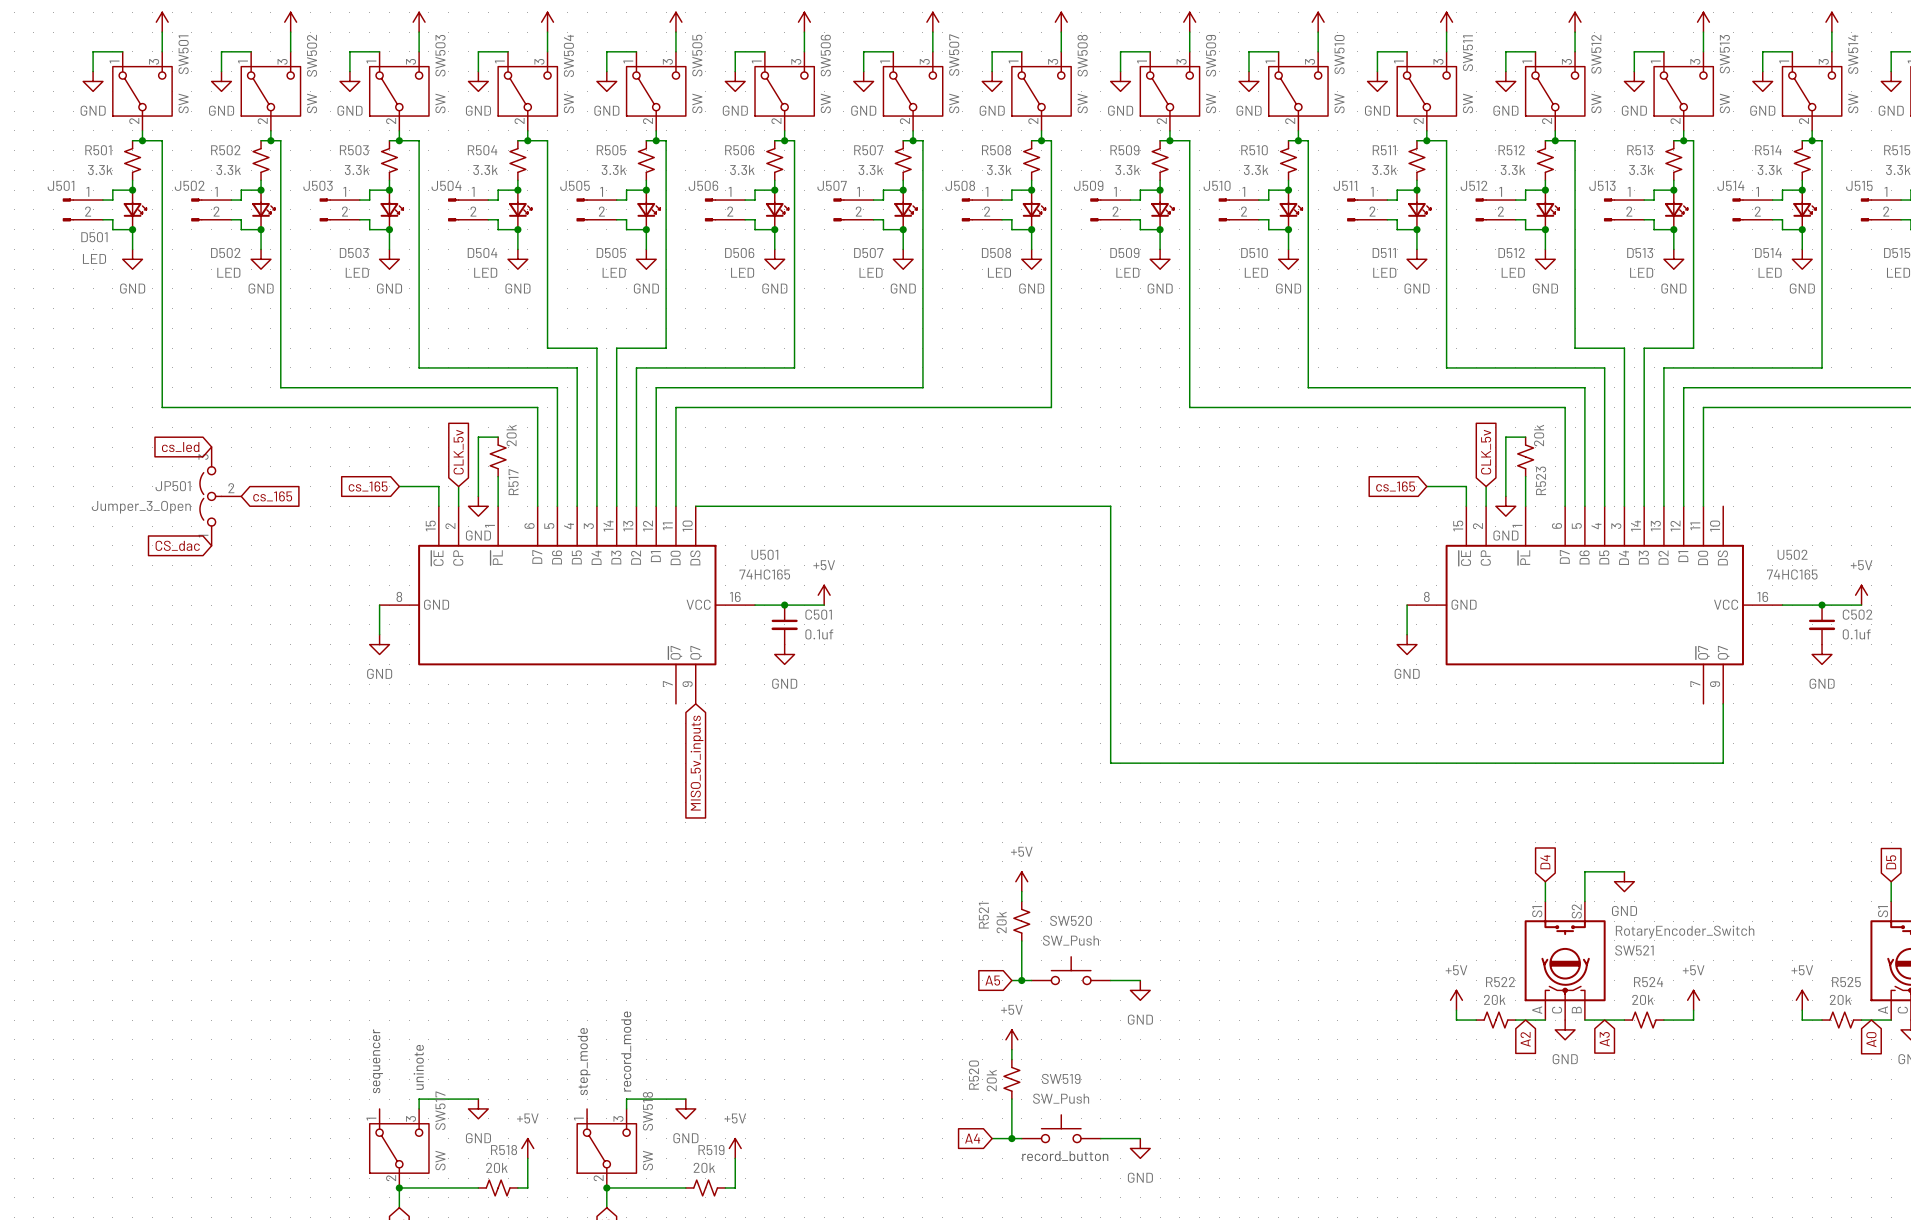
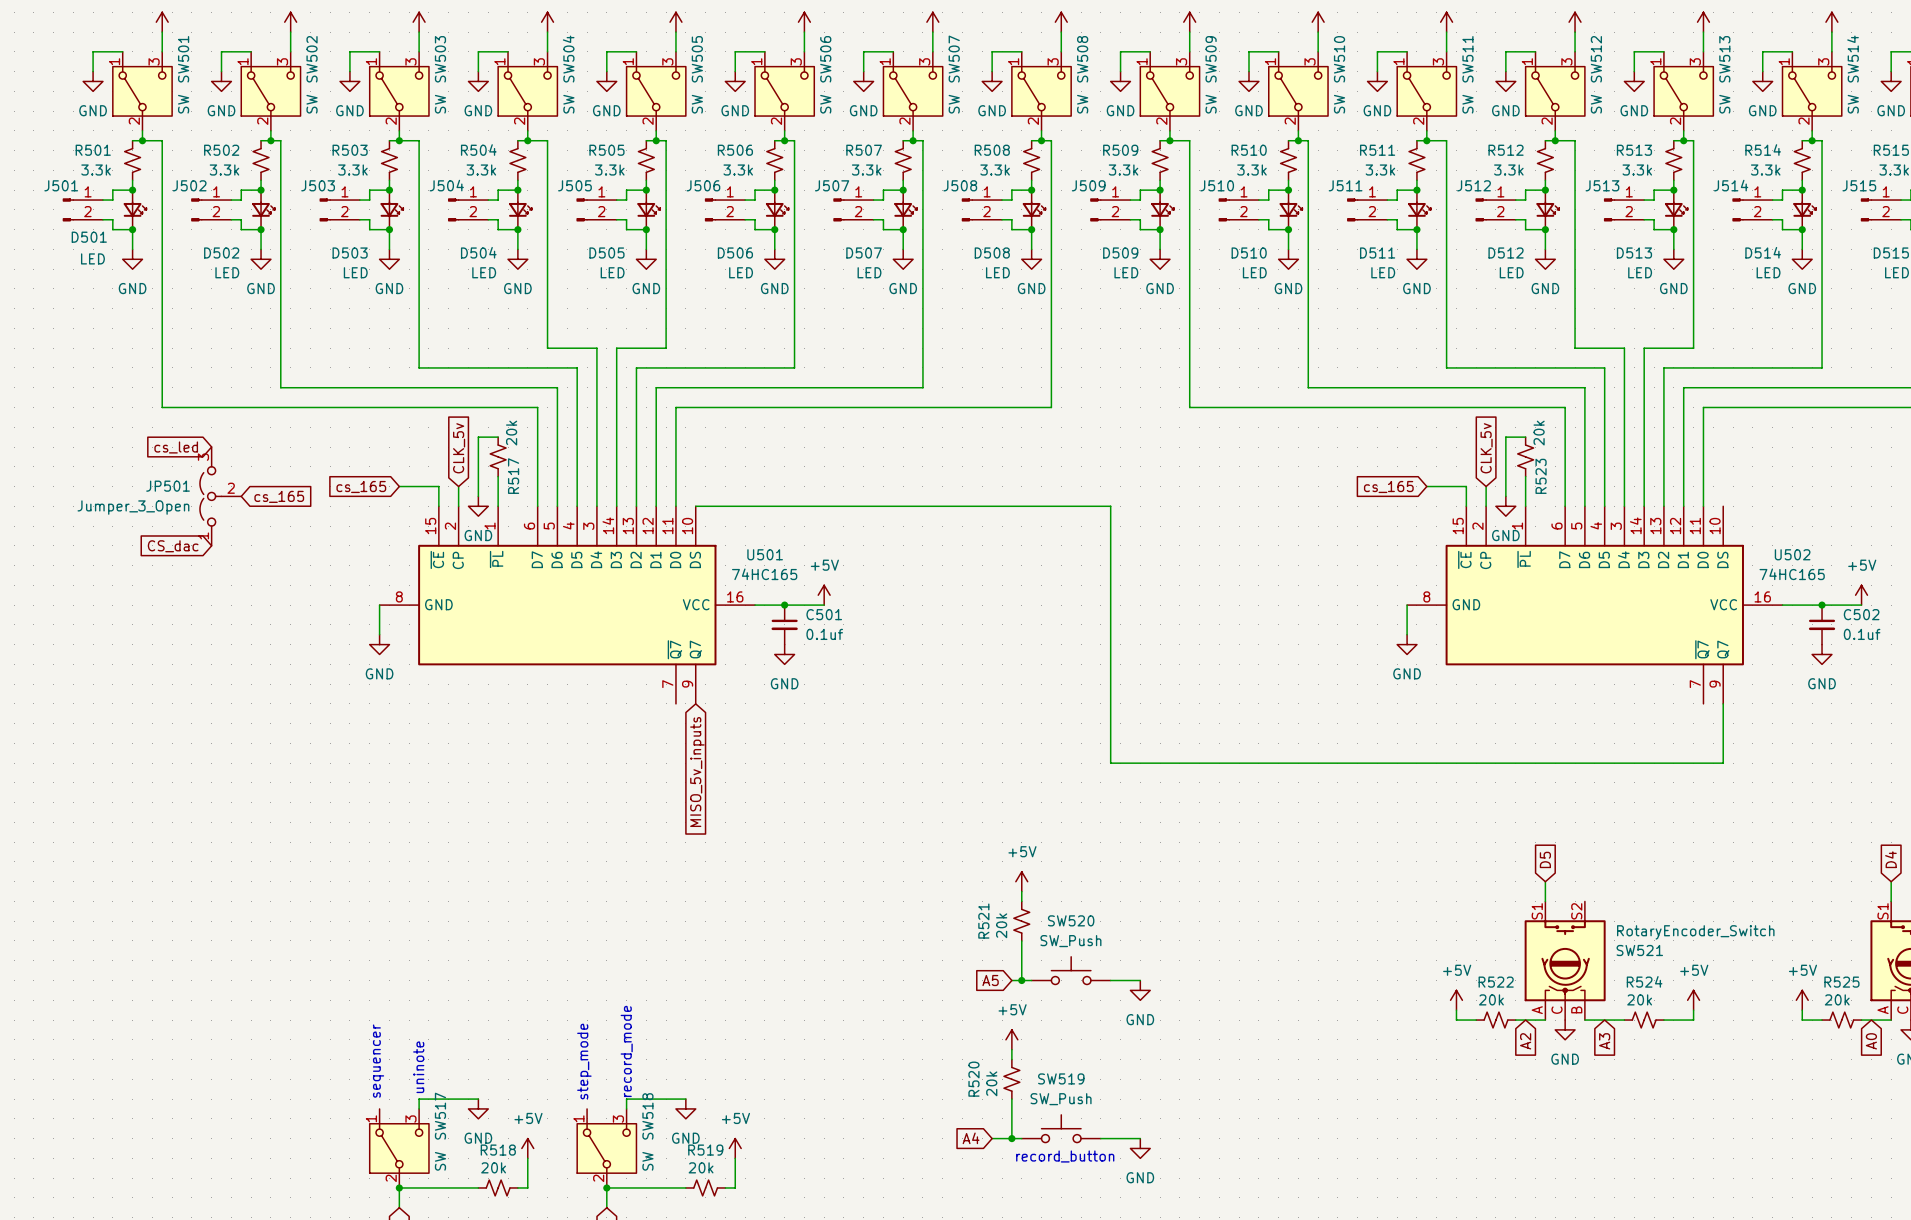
global label: D4 (1545, 862) -> D5 (1545, 859)
global label: D5 (1891, 862) -> D4 (1890, 859)
wire: (1624, 871) (1584, 871) (1584, 901) -> none
power symbol: GND (1624, 881) -> none

